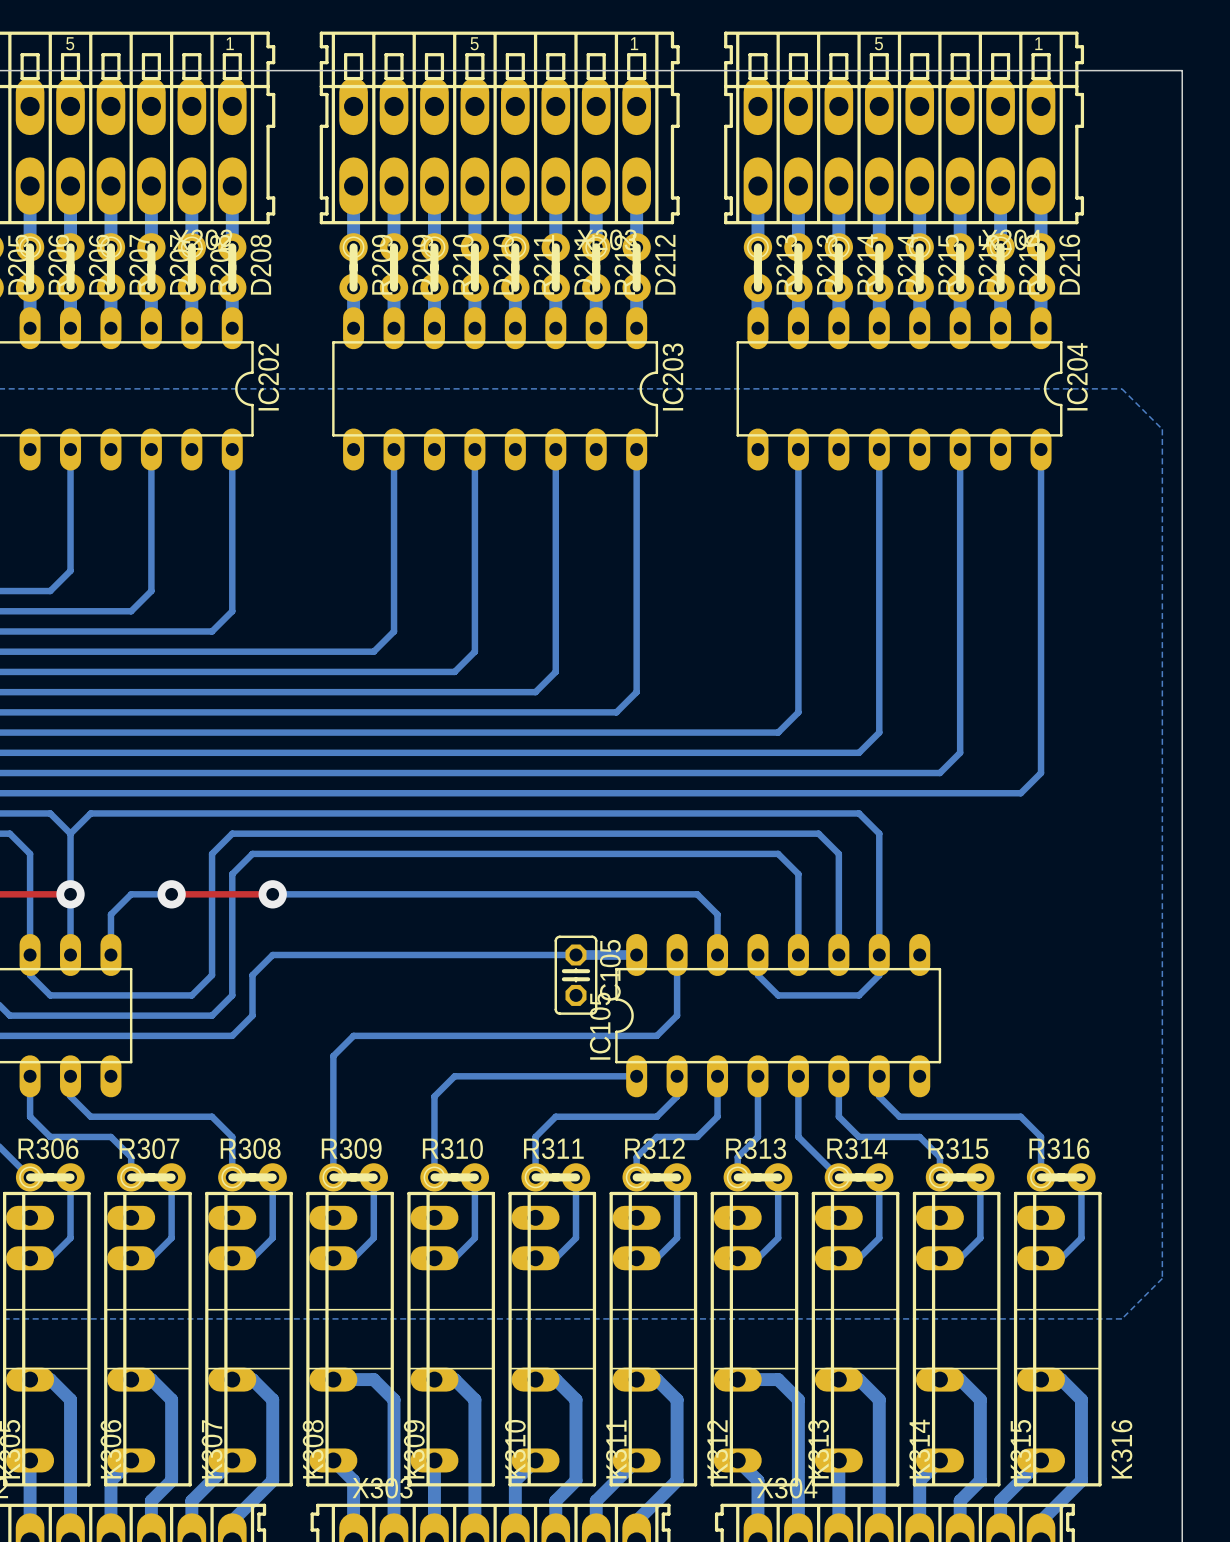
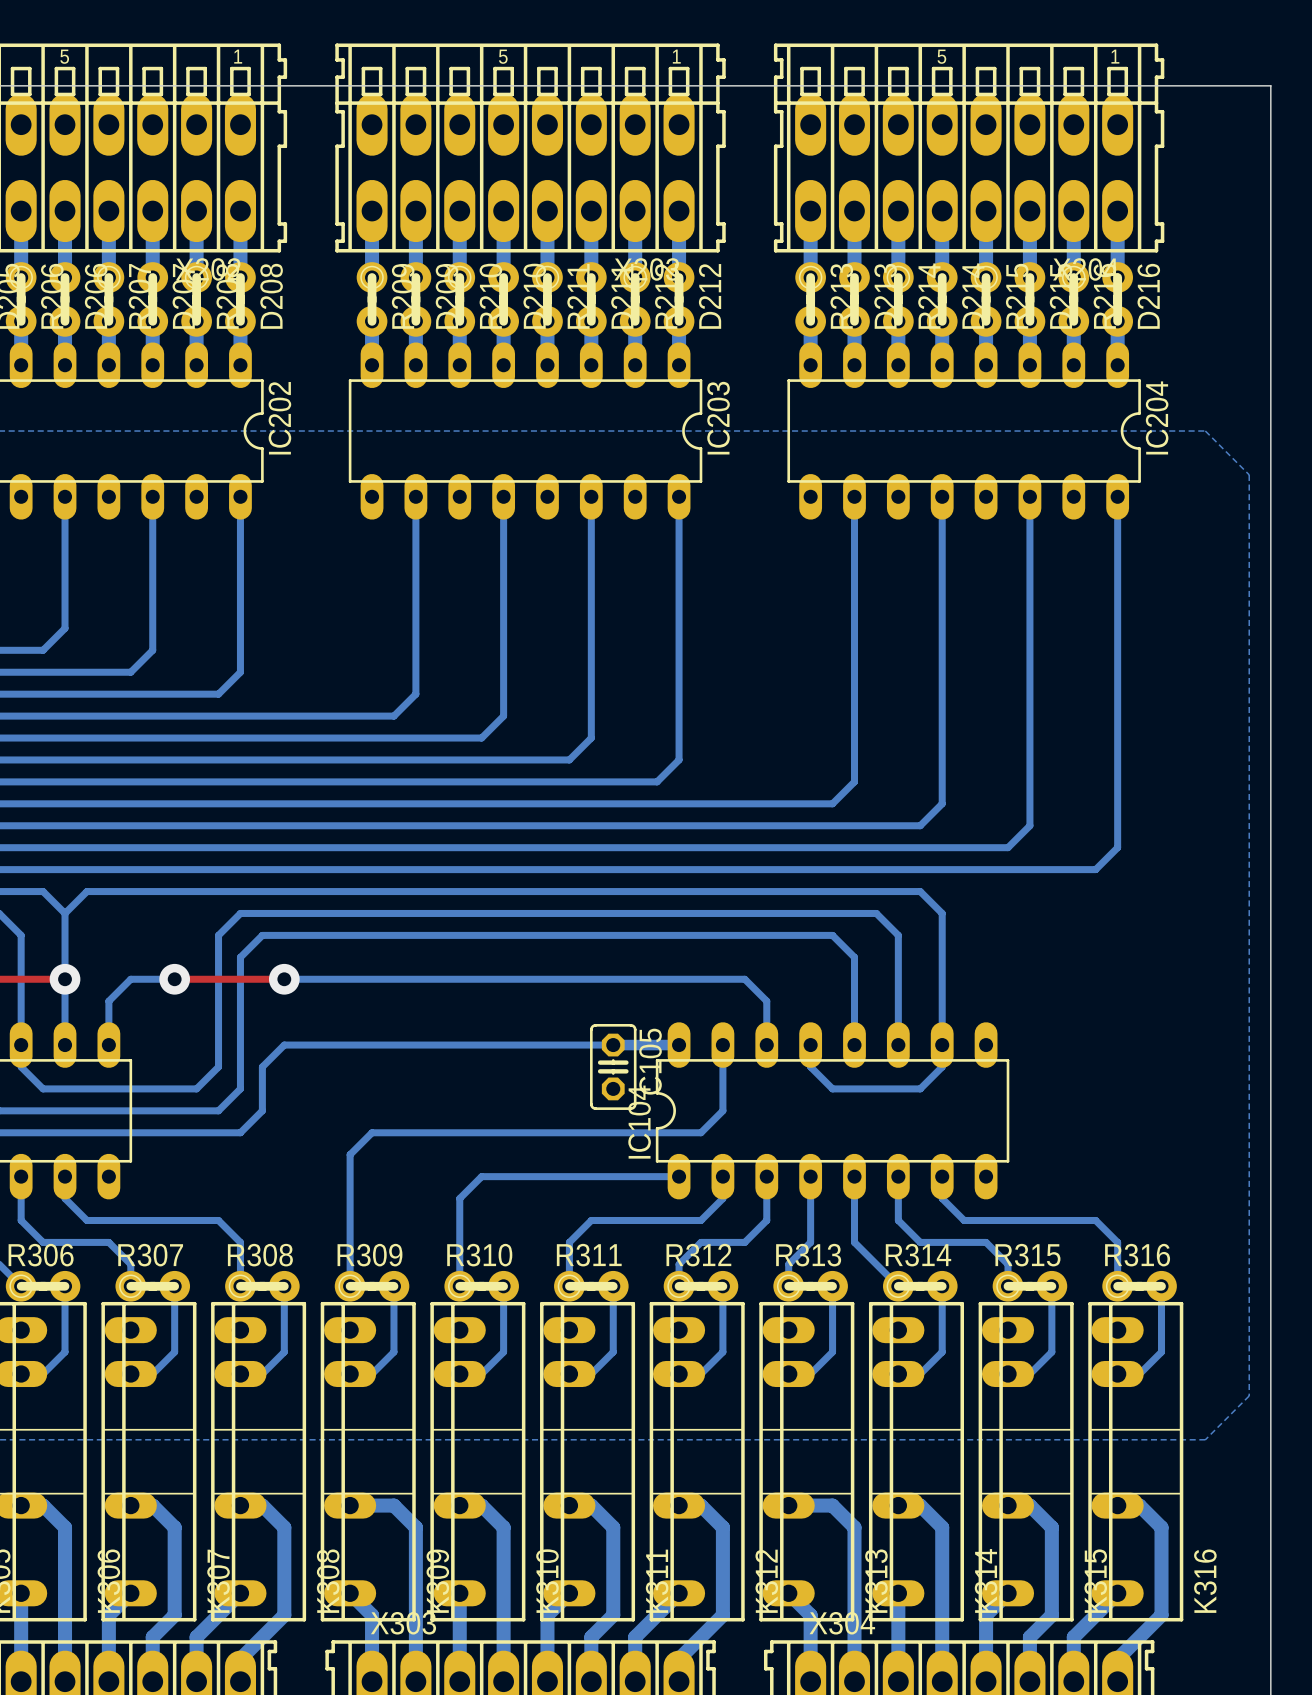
IC105 name: IC105 (600, 1026) -> IC104 (639, 1122)

